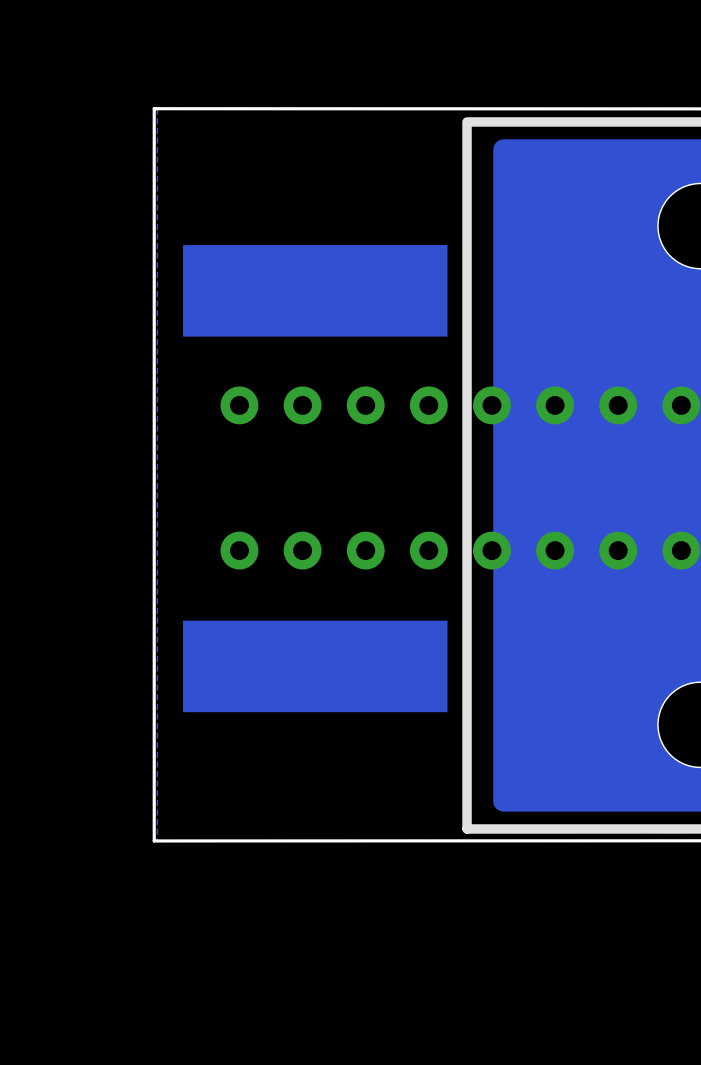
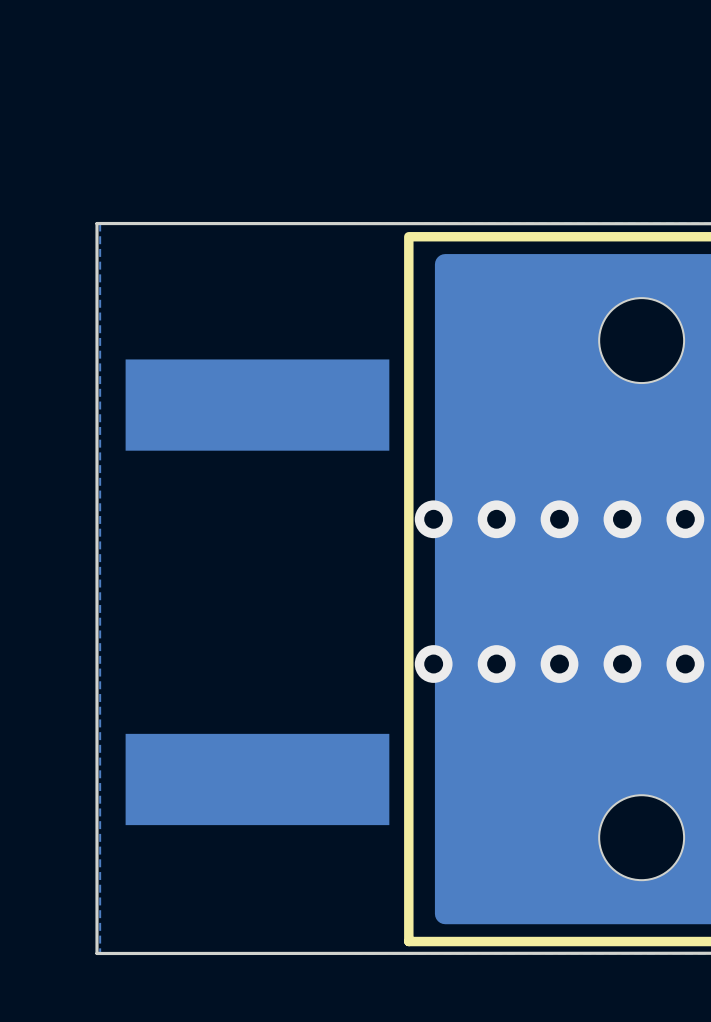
via: (239, 405) -> none
via: (302, 405) -> none
via: (365, 405) -> none
via: (428, 405) -> none
via: (239, 550) -> none
via: (302, 550) -> none
via: (365, 550) -> none
via: (428, 550) -> none

